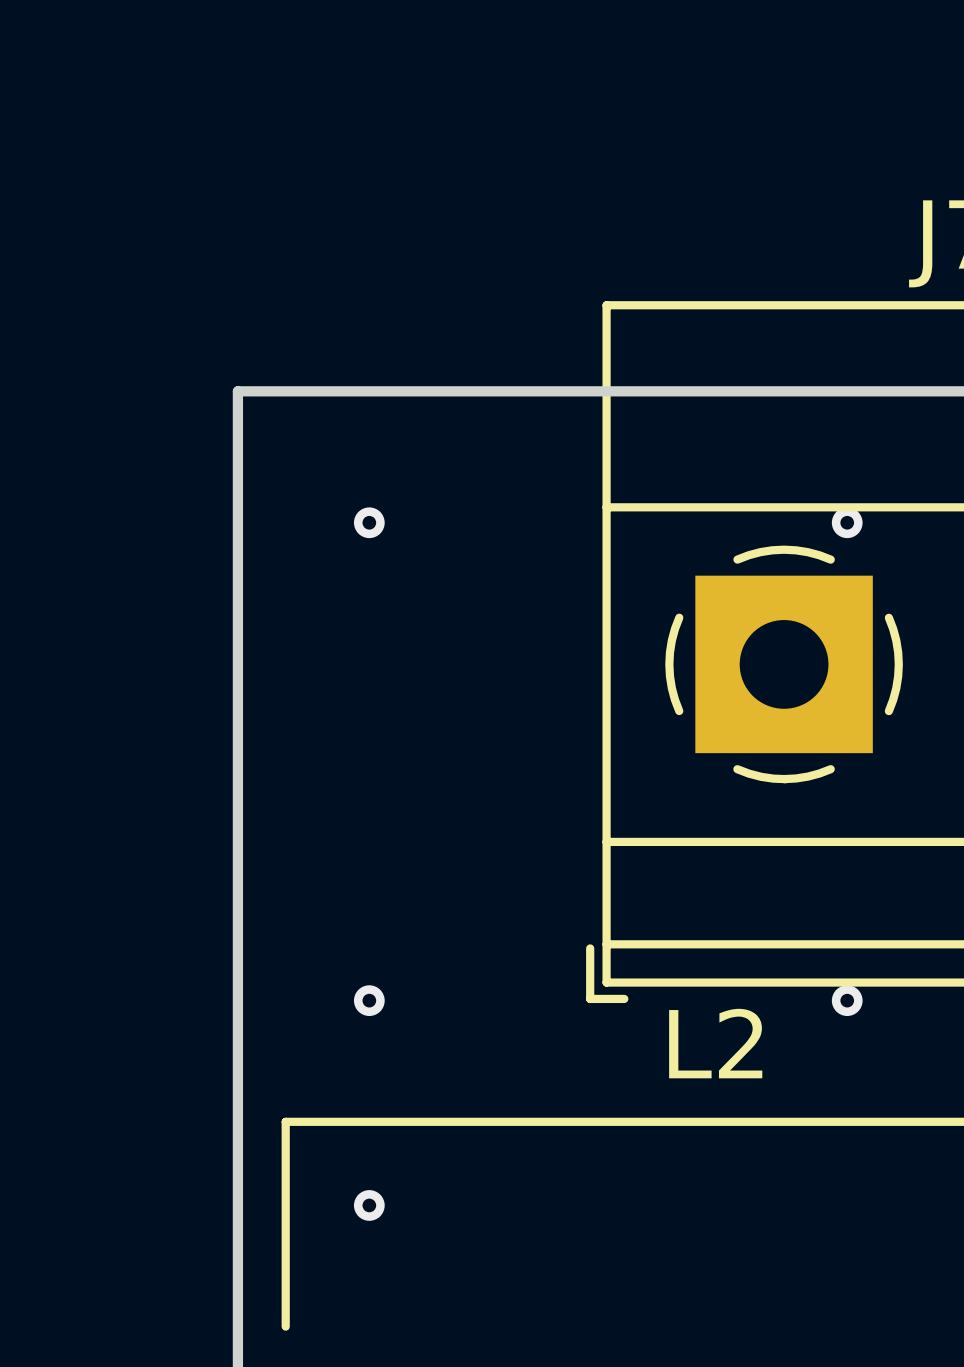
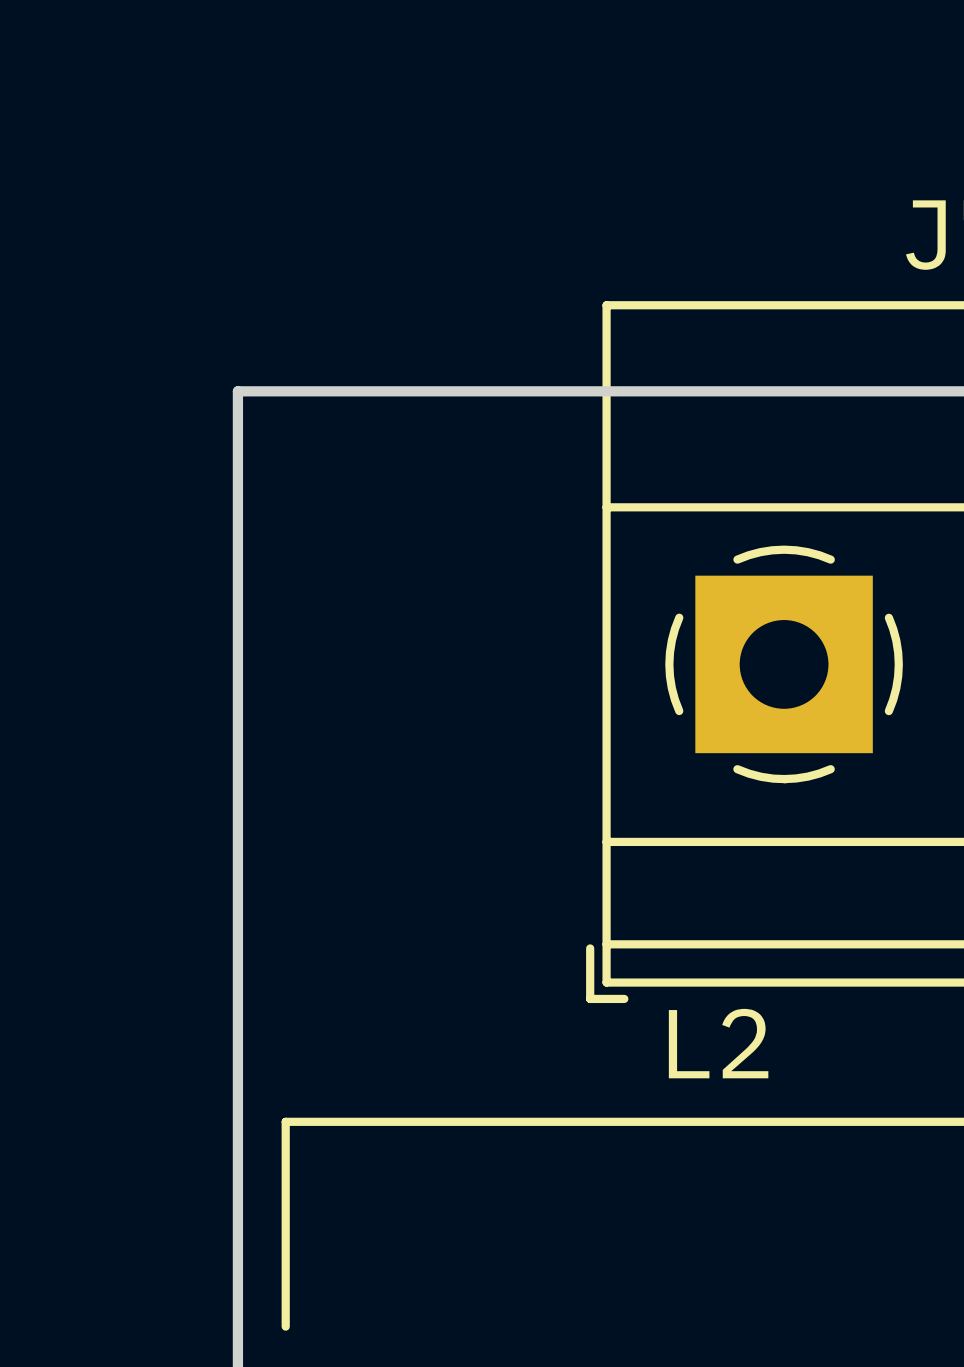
via: (369, 522) -> none
via: (847, 522) -> none
via: (369, 1000) -> none
via: (847, 1000) -> none
via: (369, 1205) -> none

